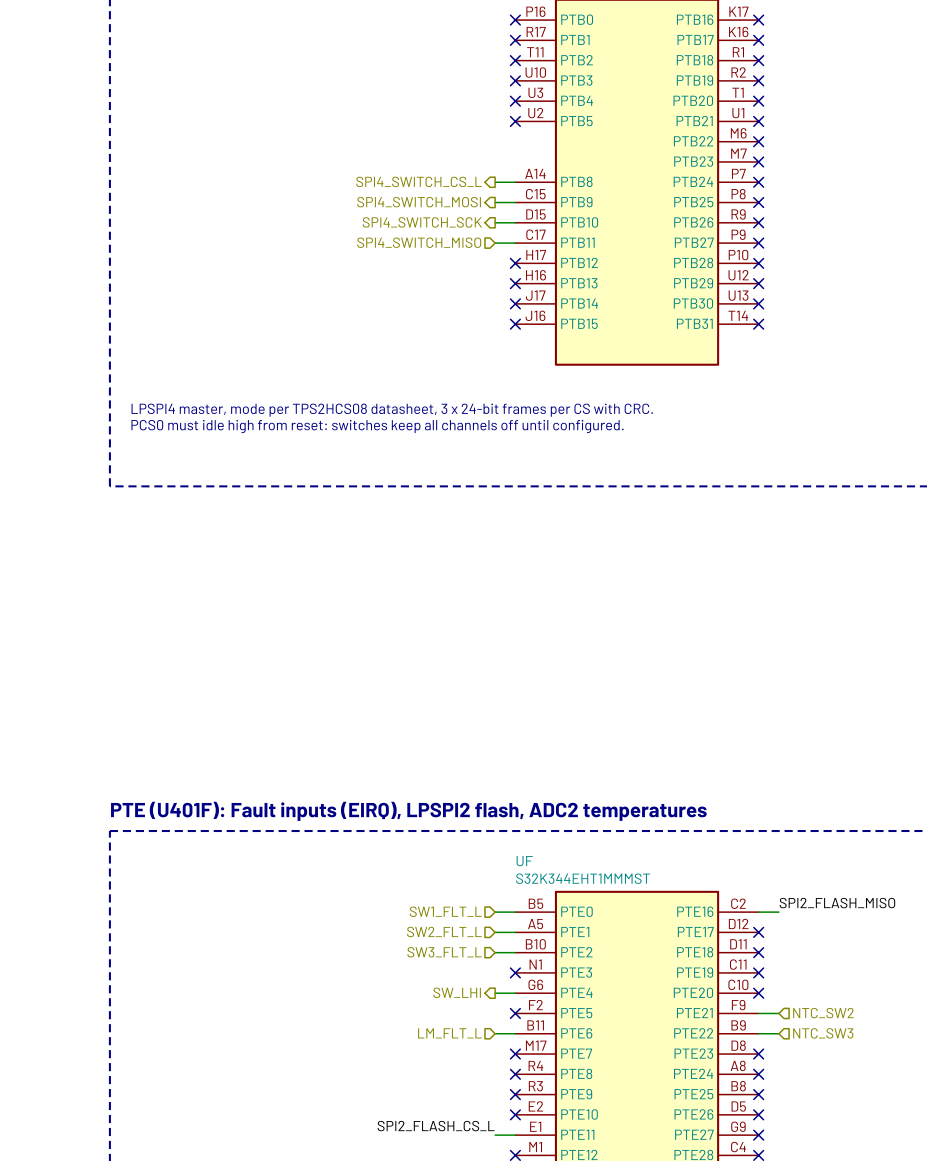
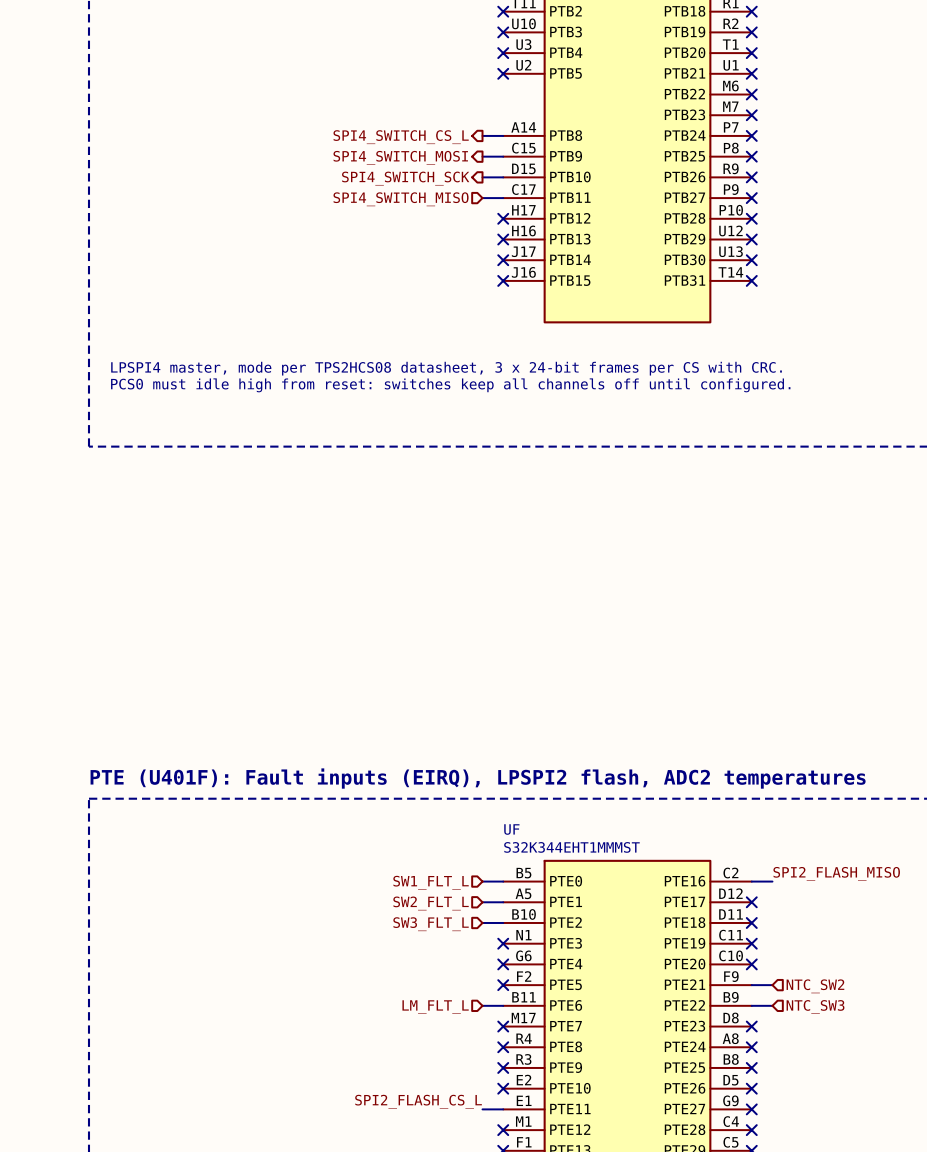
hierarchical label: SW_LHI (457, 992) -> none
wire: (495, 993) (515, 993) -> none
no-connect mark: none -> (503, 964)

